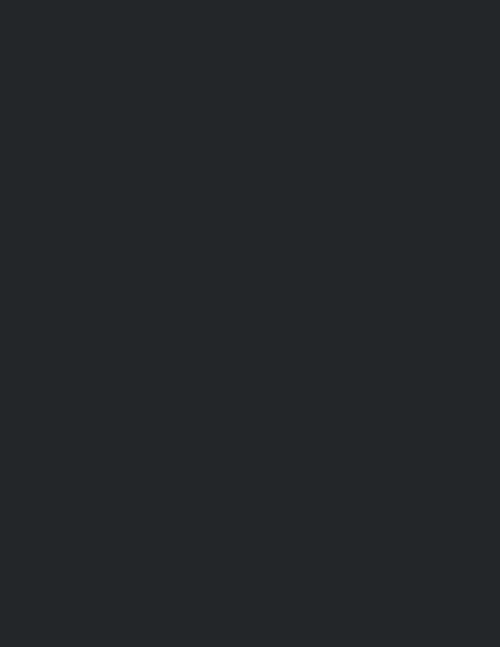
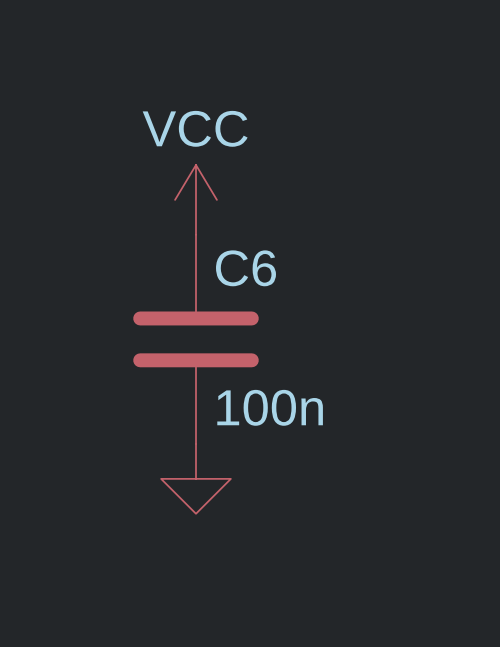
power symbol: none -> VCC (195, 199)
C6: none -> 100n (195, 339)
power symbol: none -> (195, 478)

